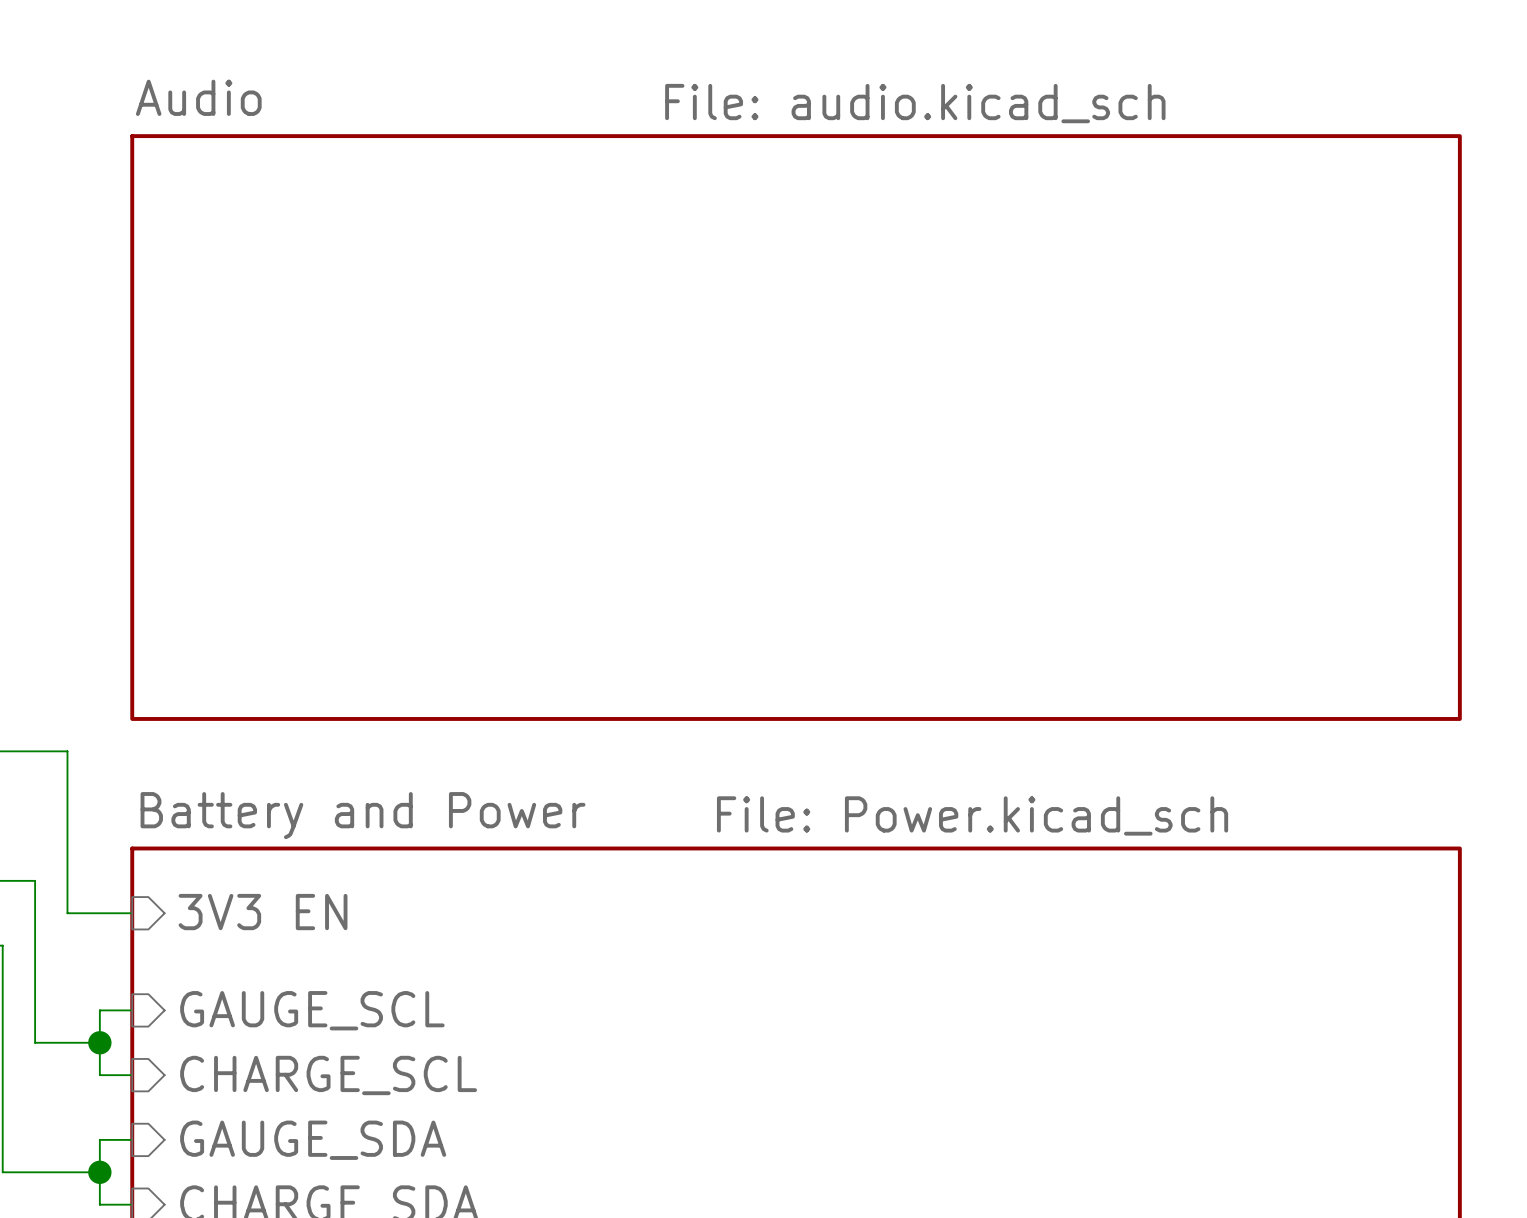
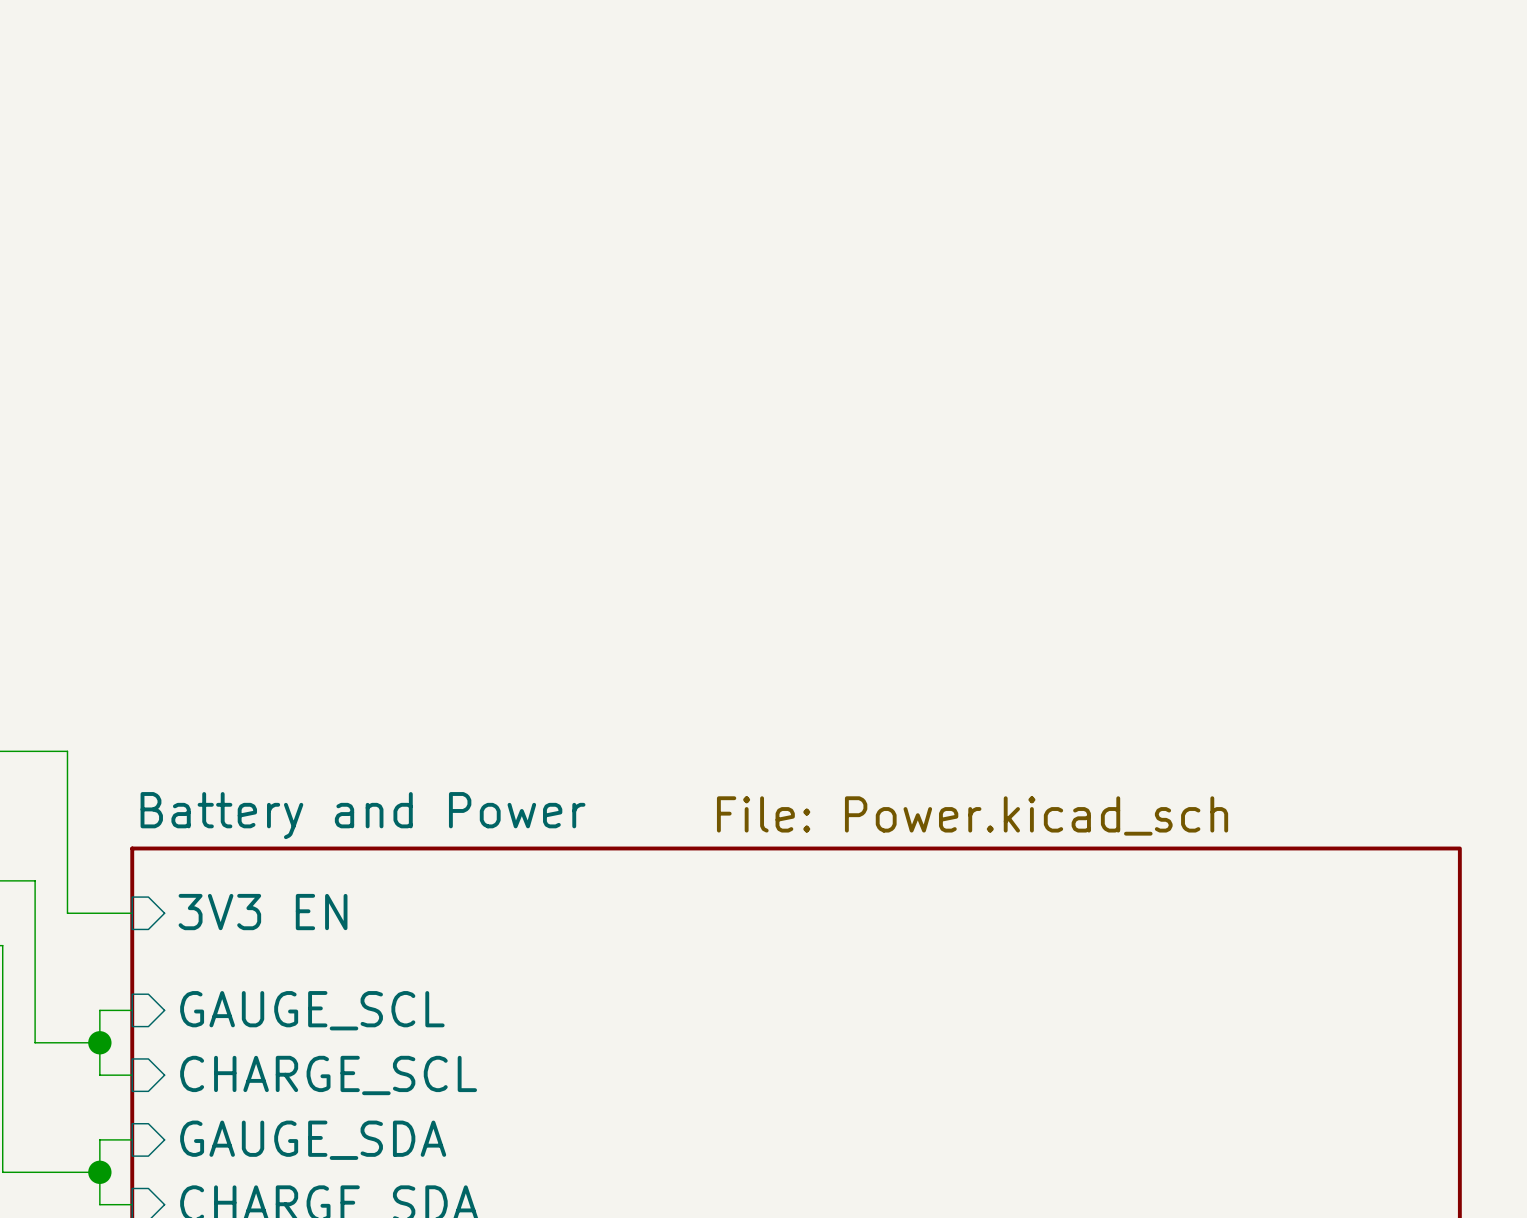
sheet Audio: File: audio.kicad_sch (796, 427) -> none

